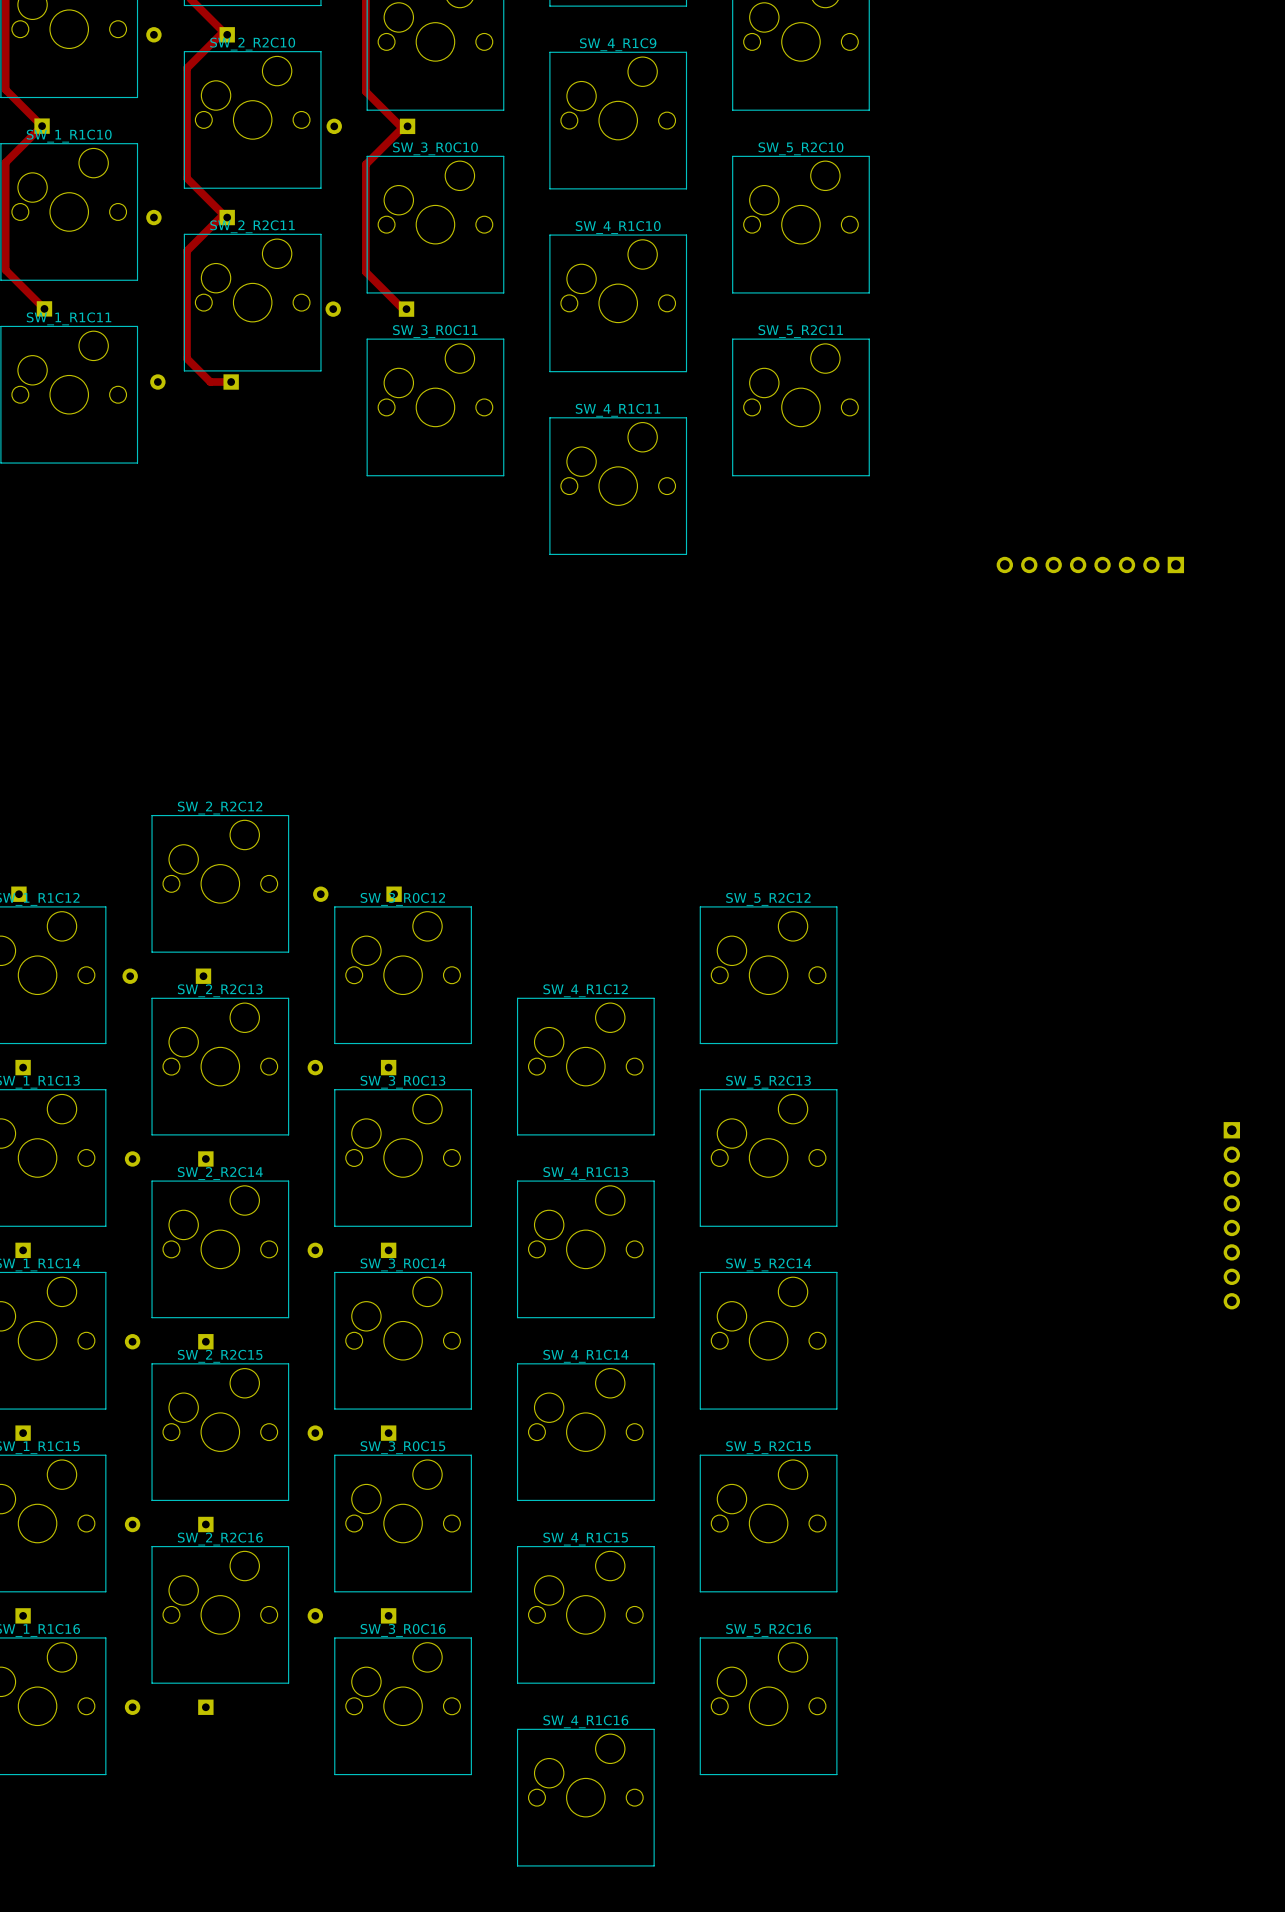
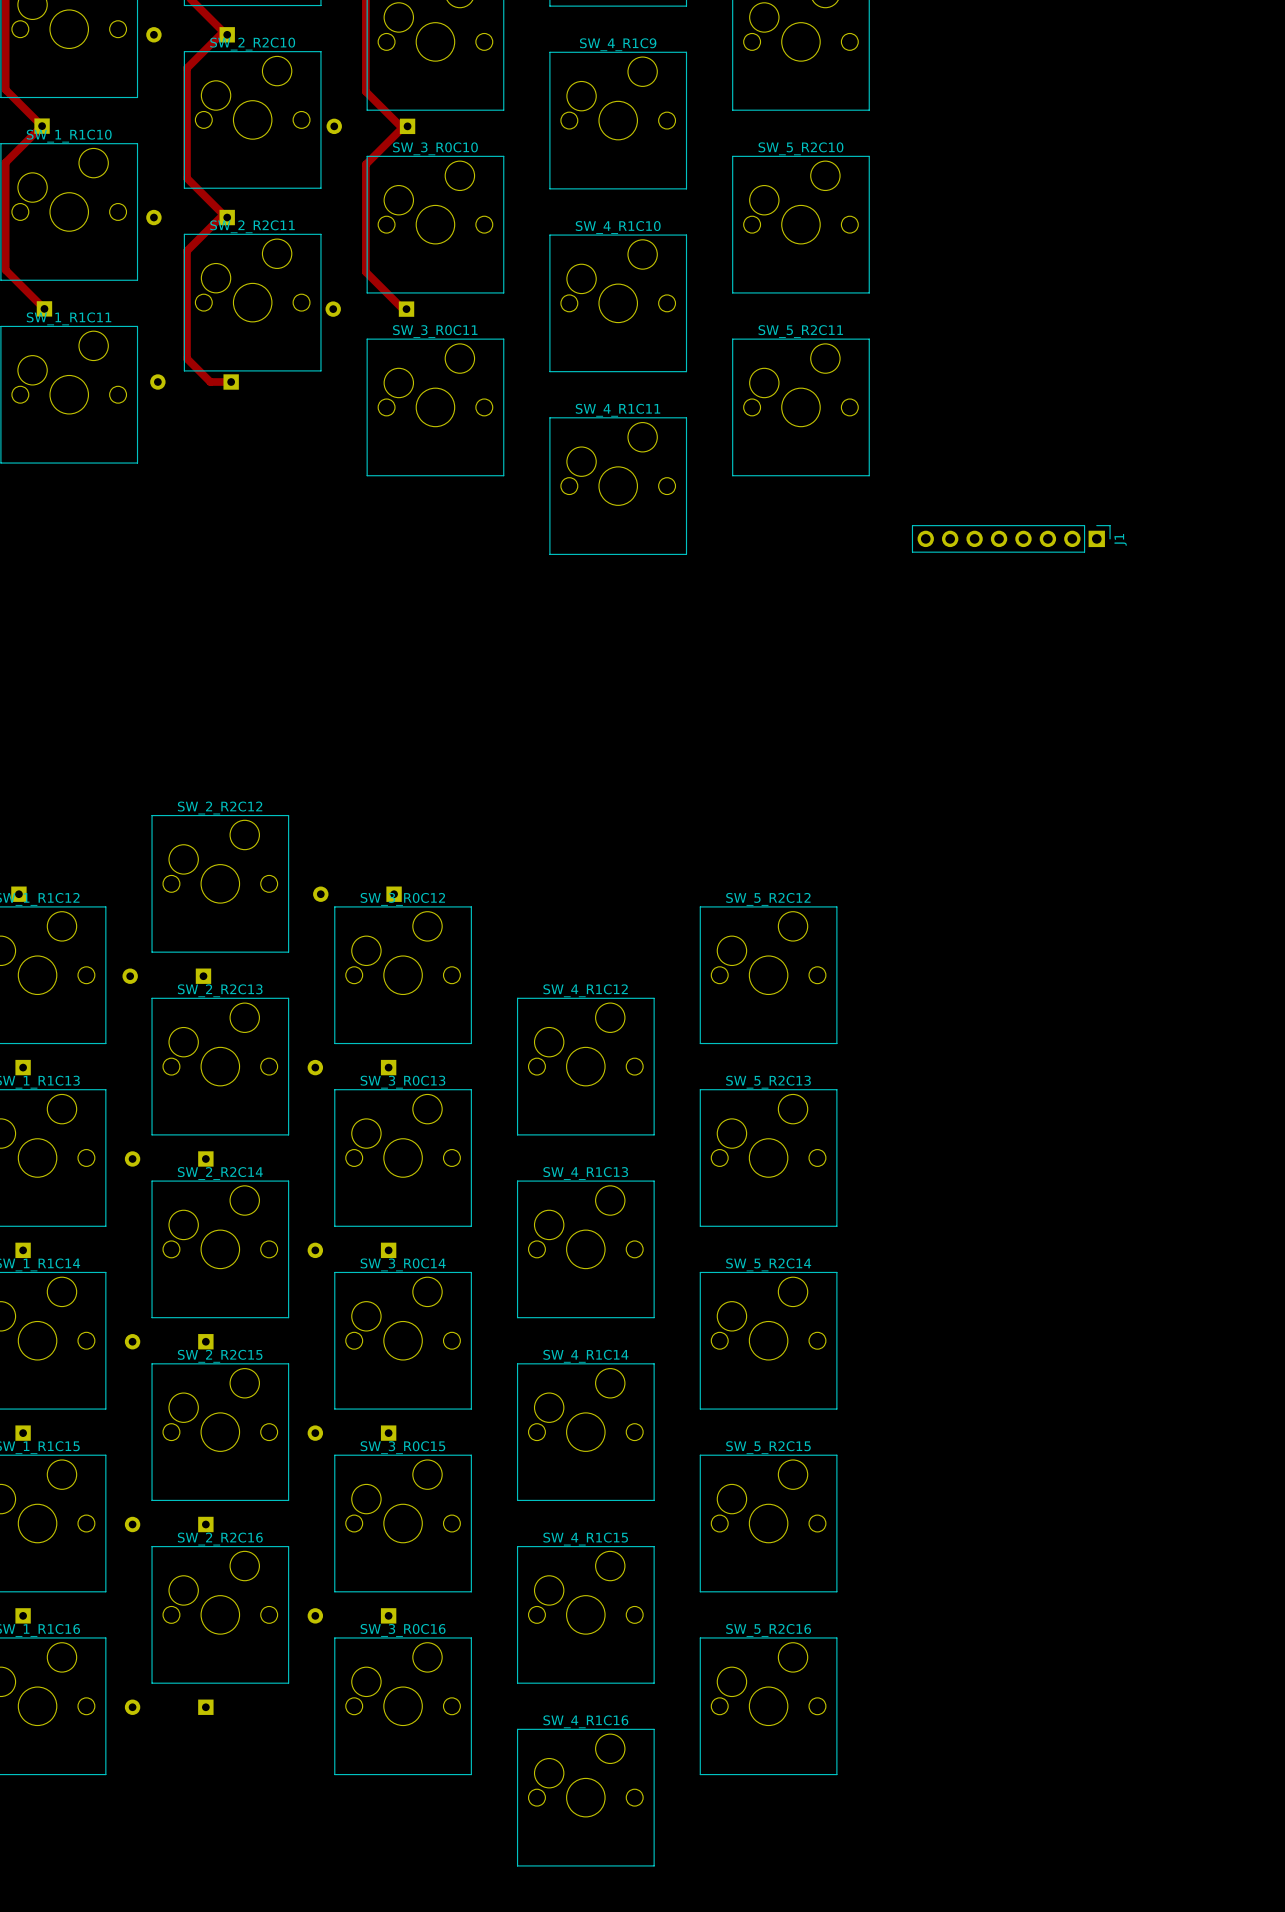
J1 side: bottom (1090, 564) -> top (1011, 538)
part: (1231, 1215) -> none

